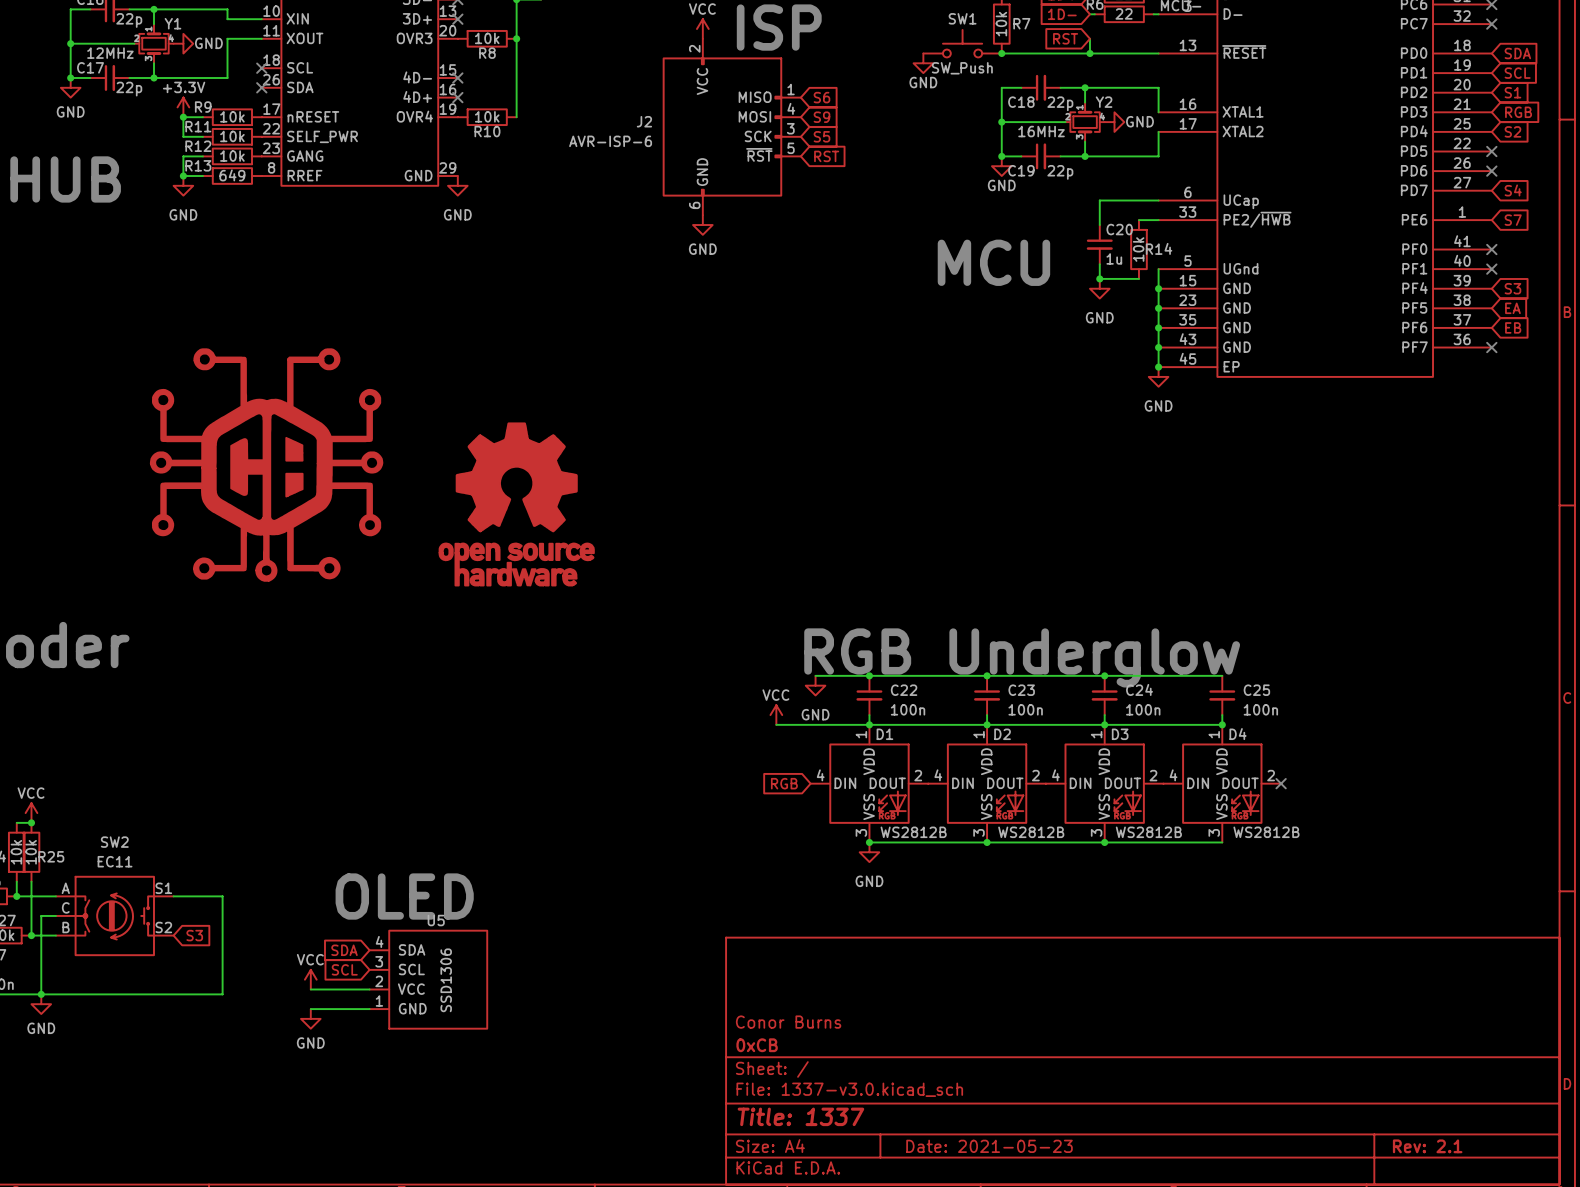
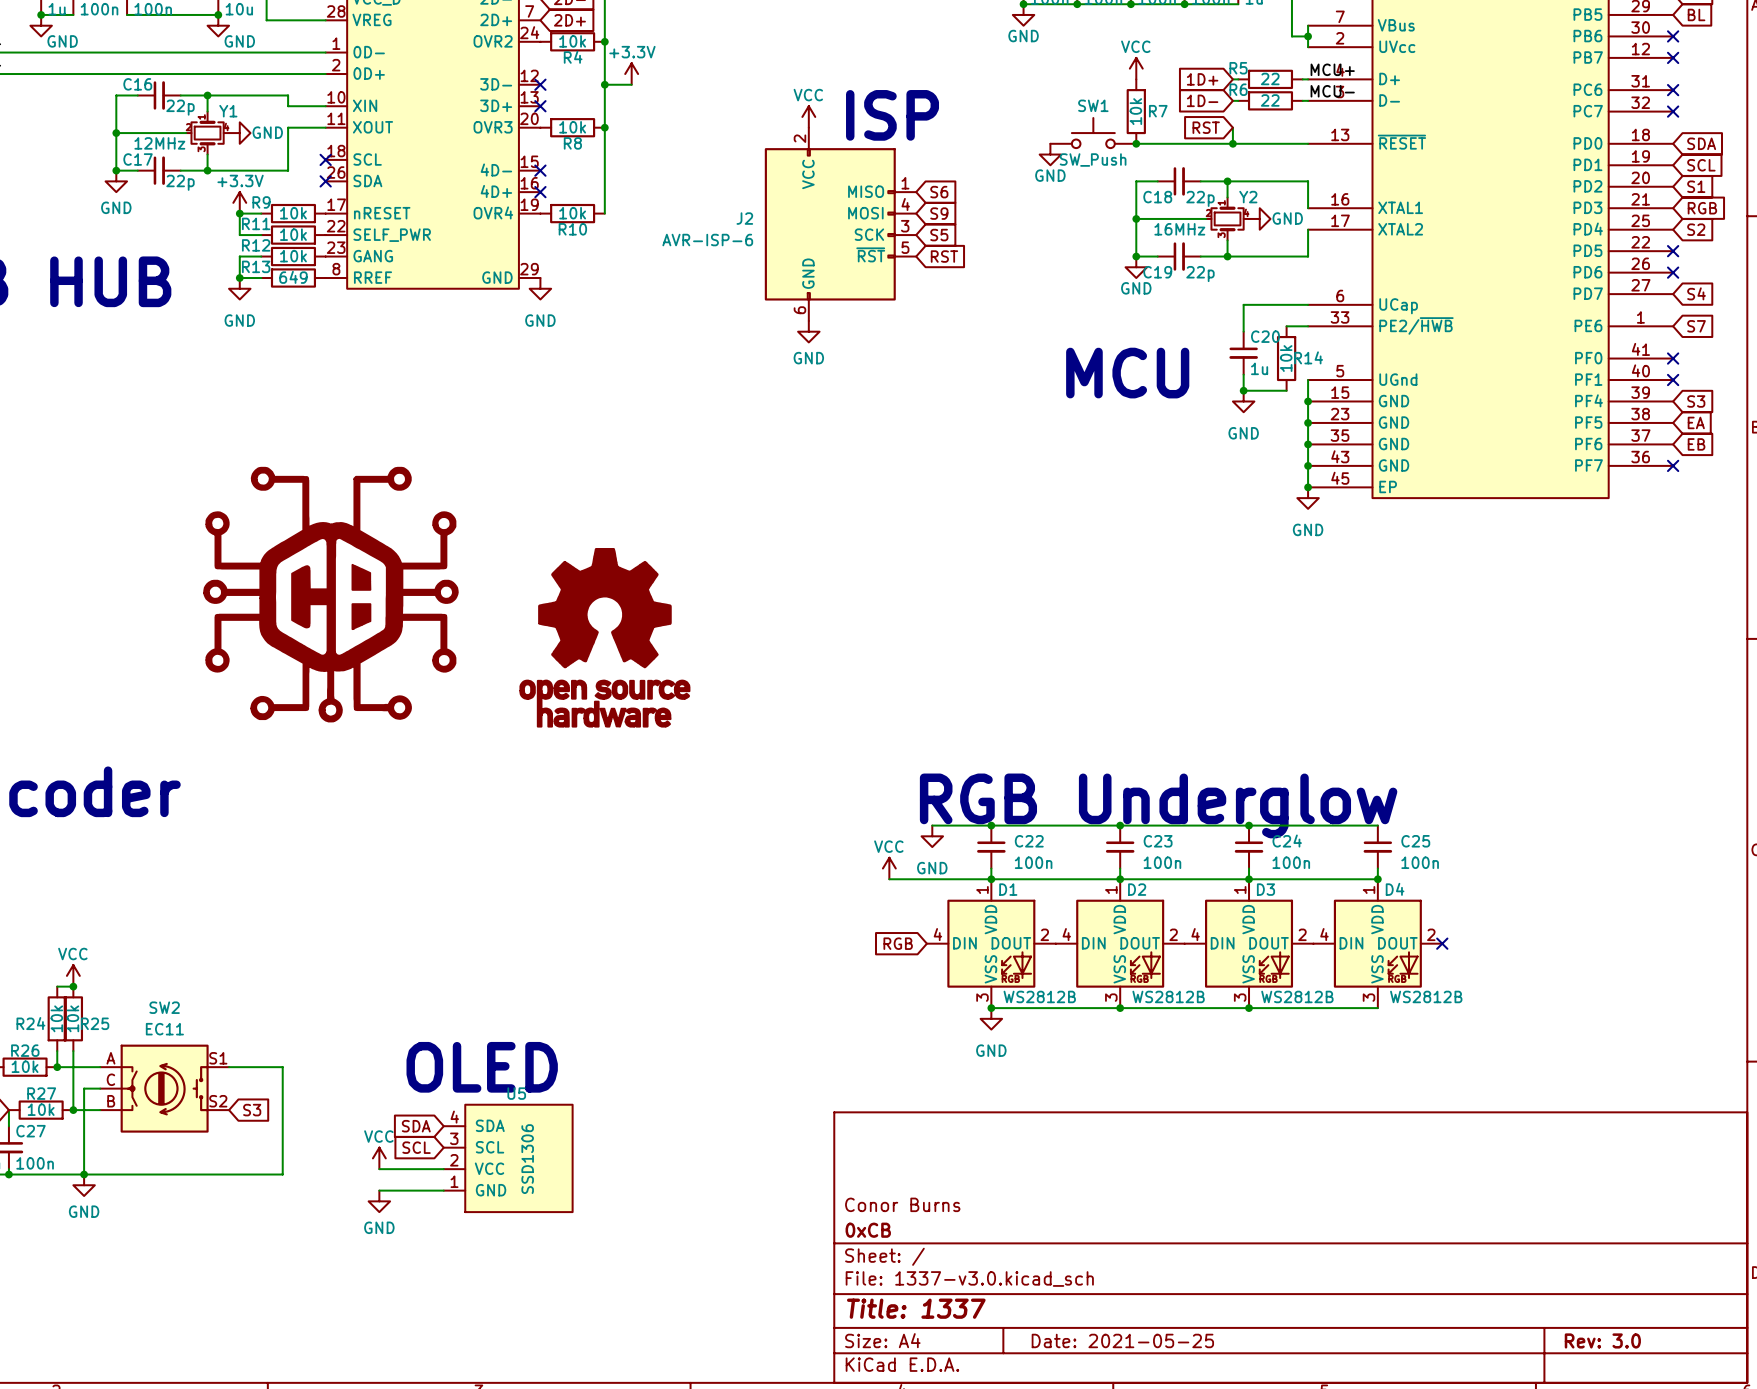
title block: Date: 2021-05-23 (989, 1146) -> Date: 2021-05-25 (1122, 1340)
title block: Rev: 2.1 (1427, 1146) -> Rev: 3.0 (1602, 1340)

